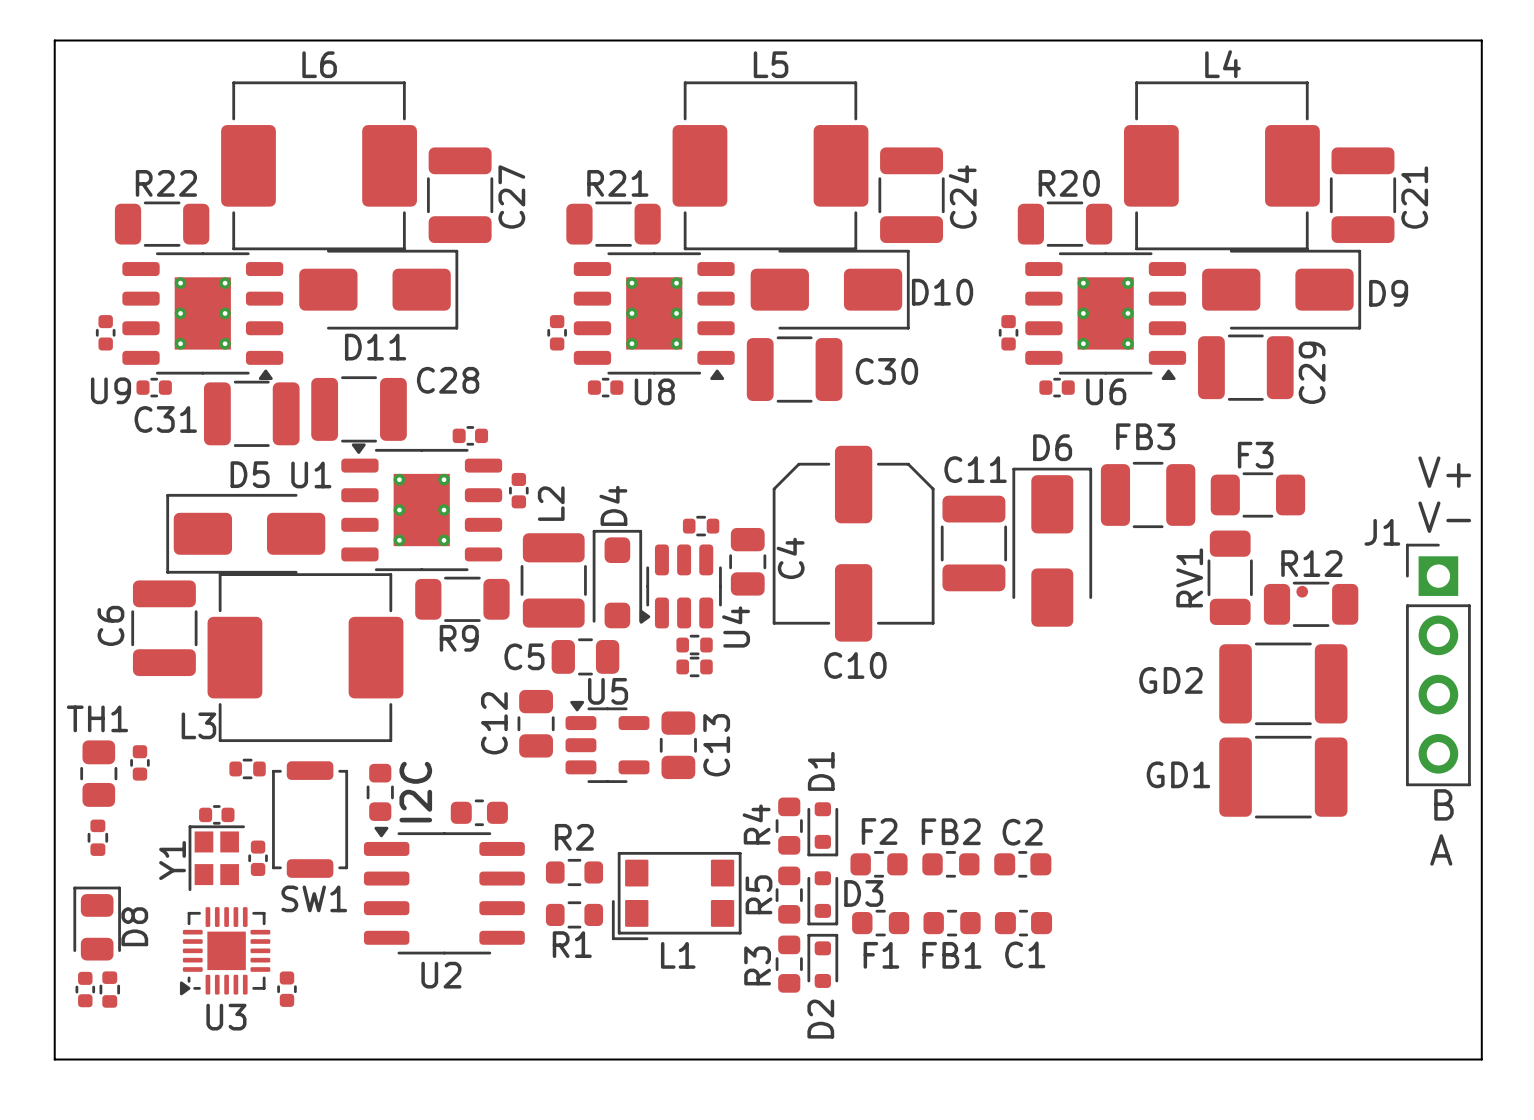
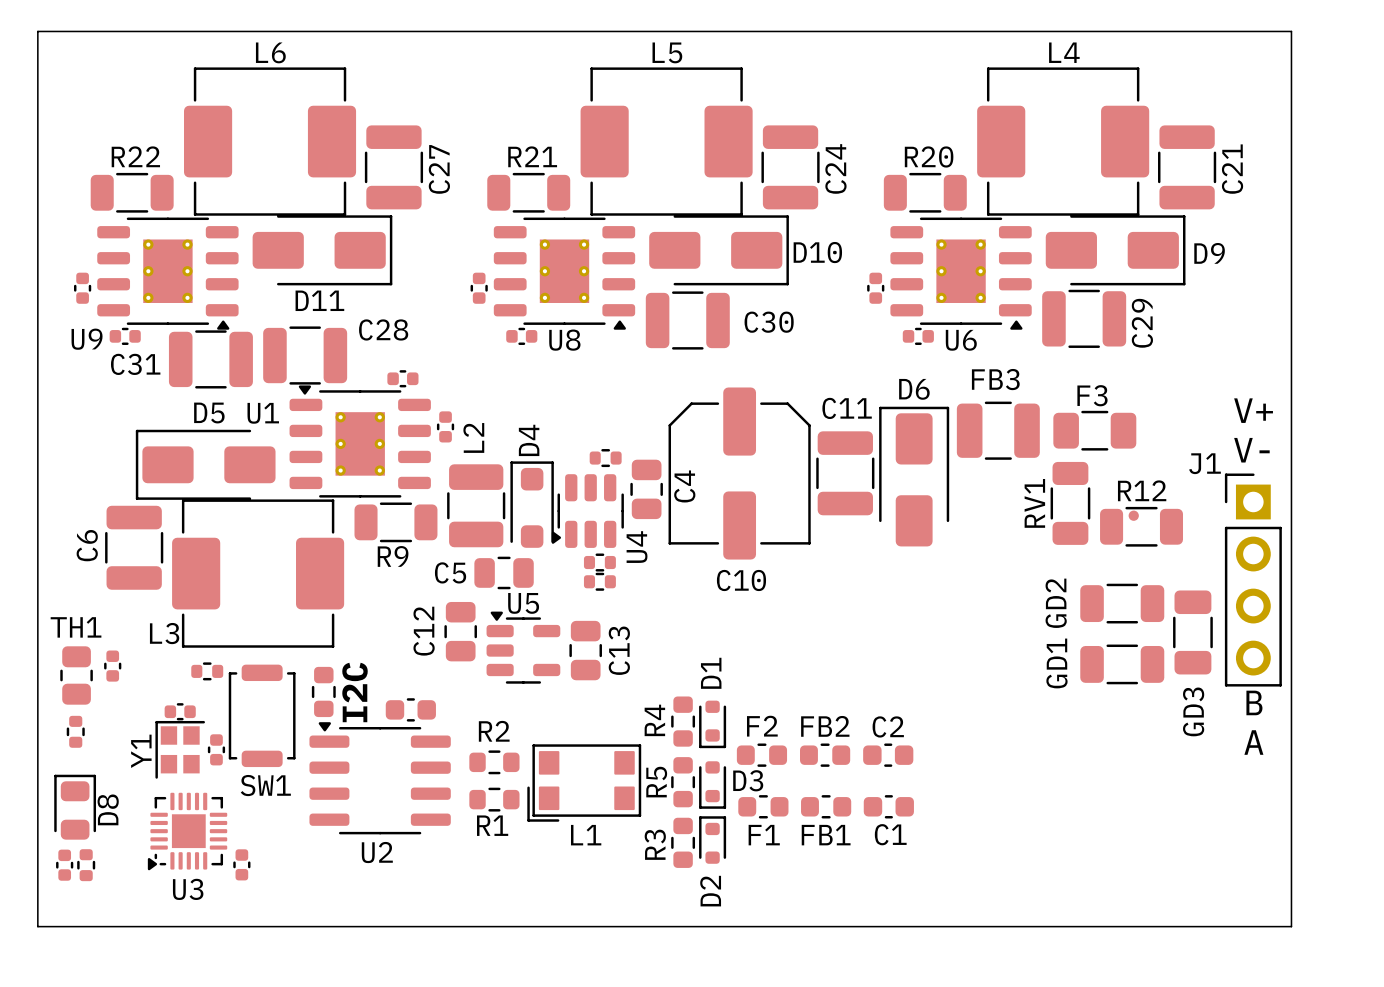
GD2 footprint: [1219, 642, 1348, 726] -> [1080, 583, 1165, 624]
GD3: none -> (1192, 632)
GD1 footprint: [1219, 735, 1348, 819] -> [1080, 644, 1165, 685]

